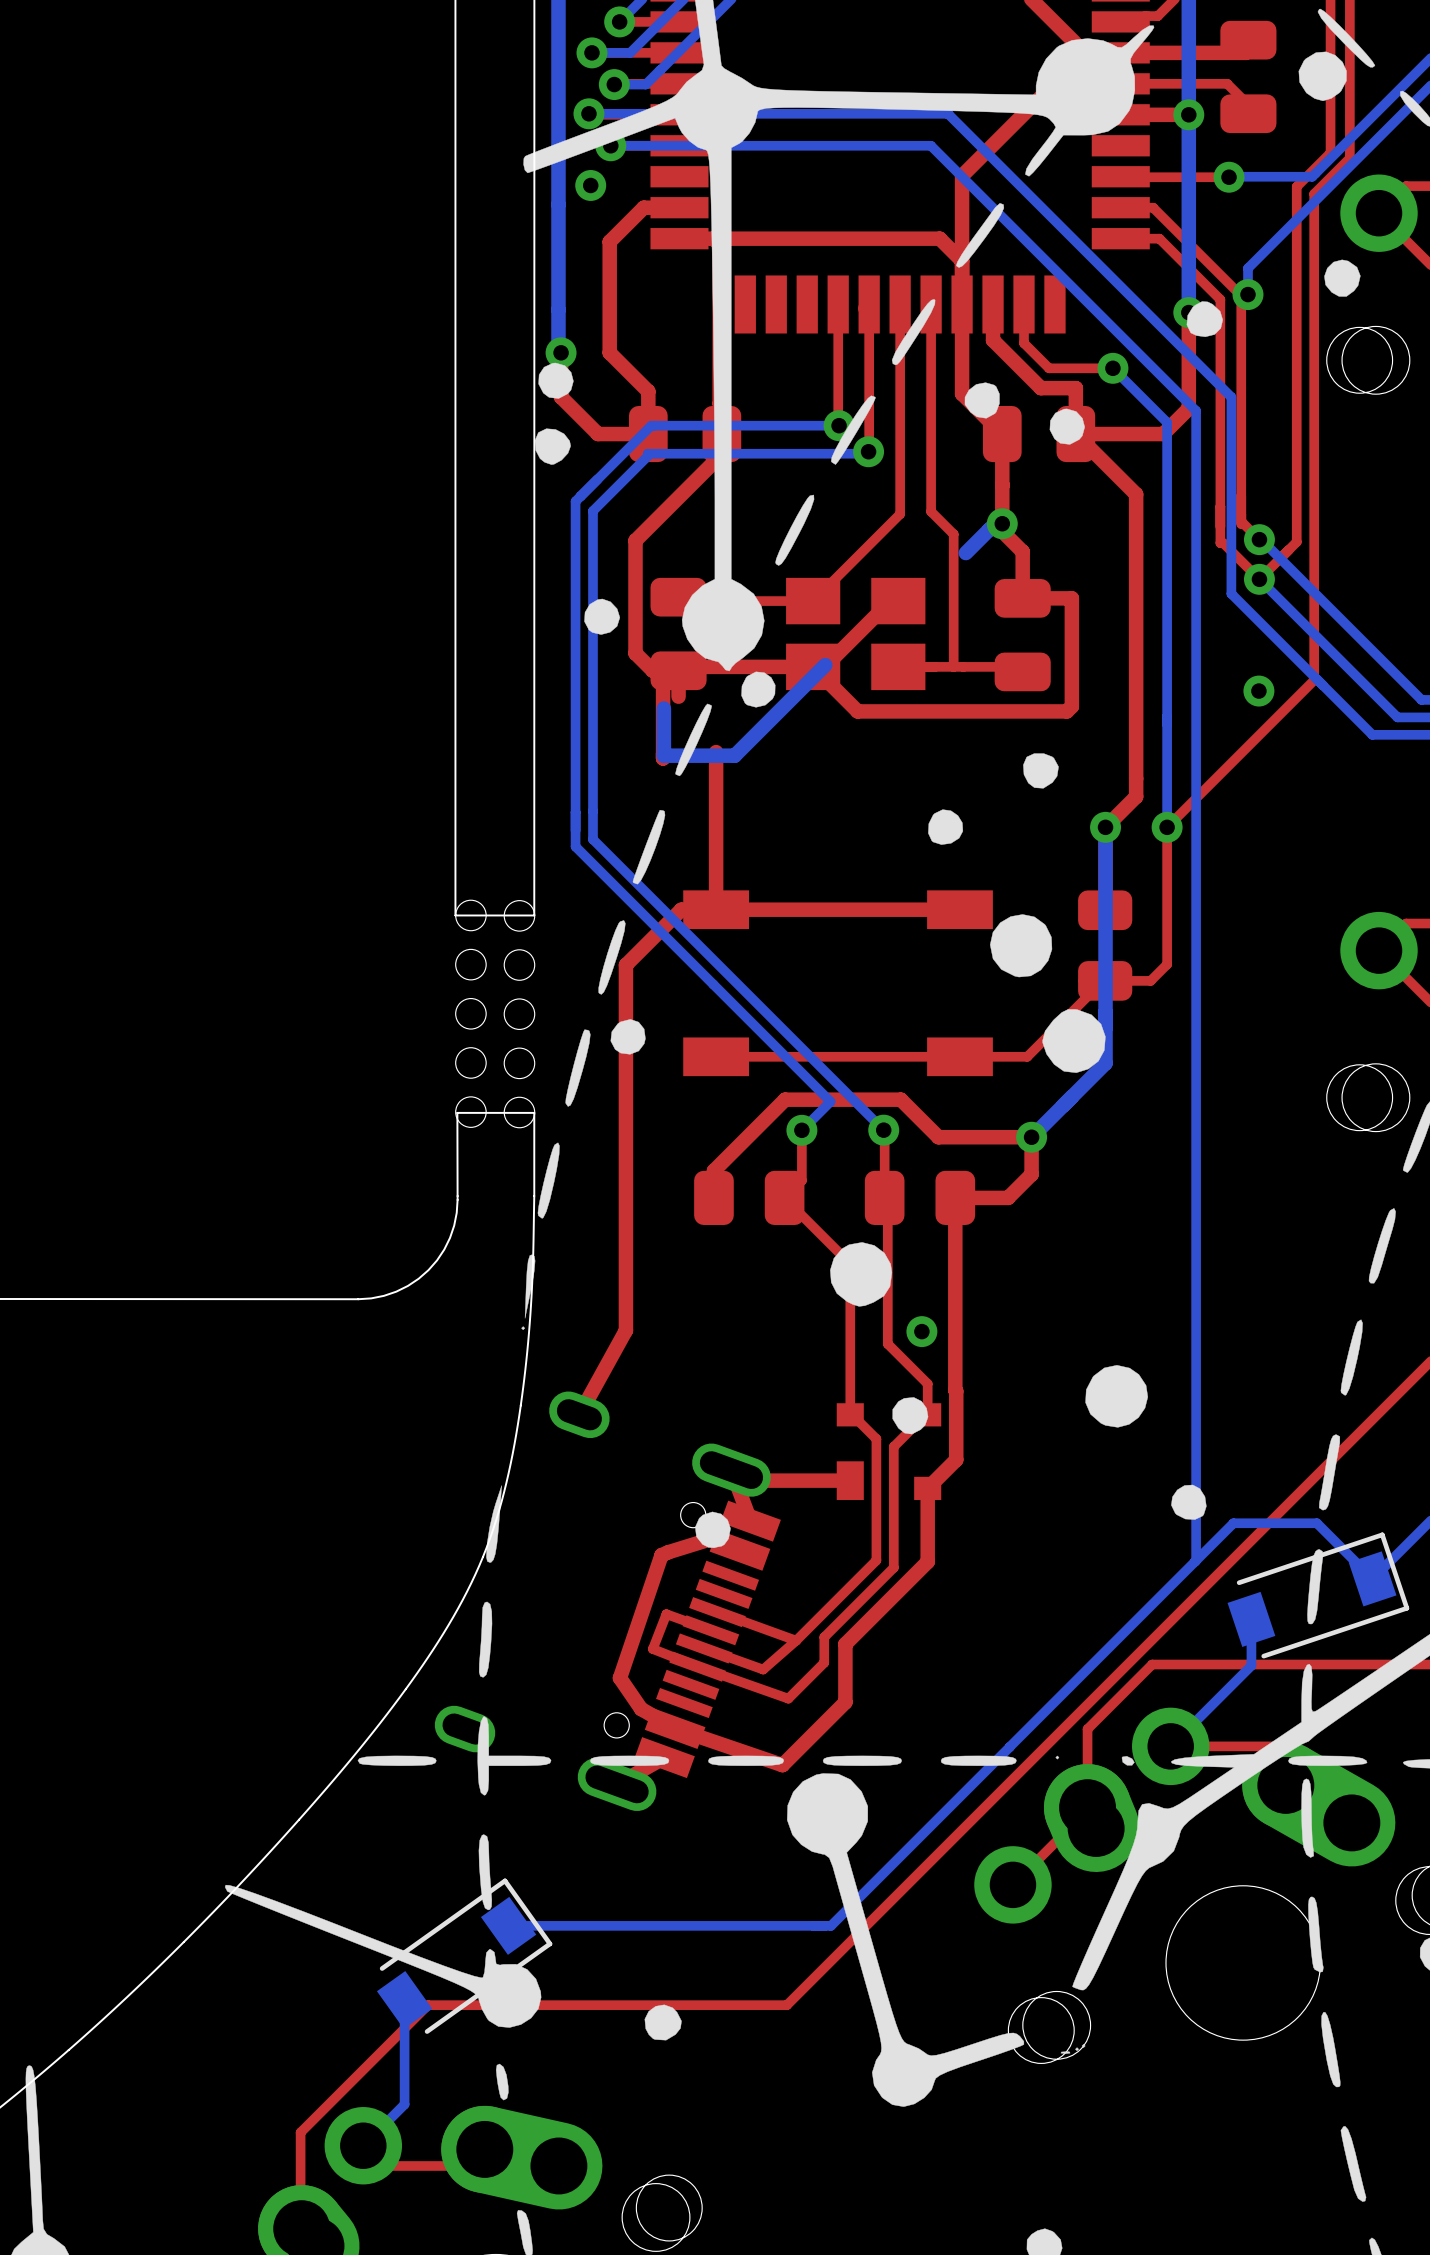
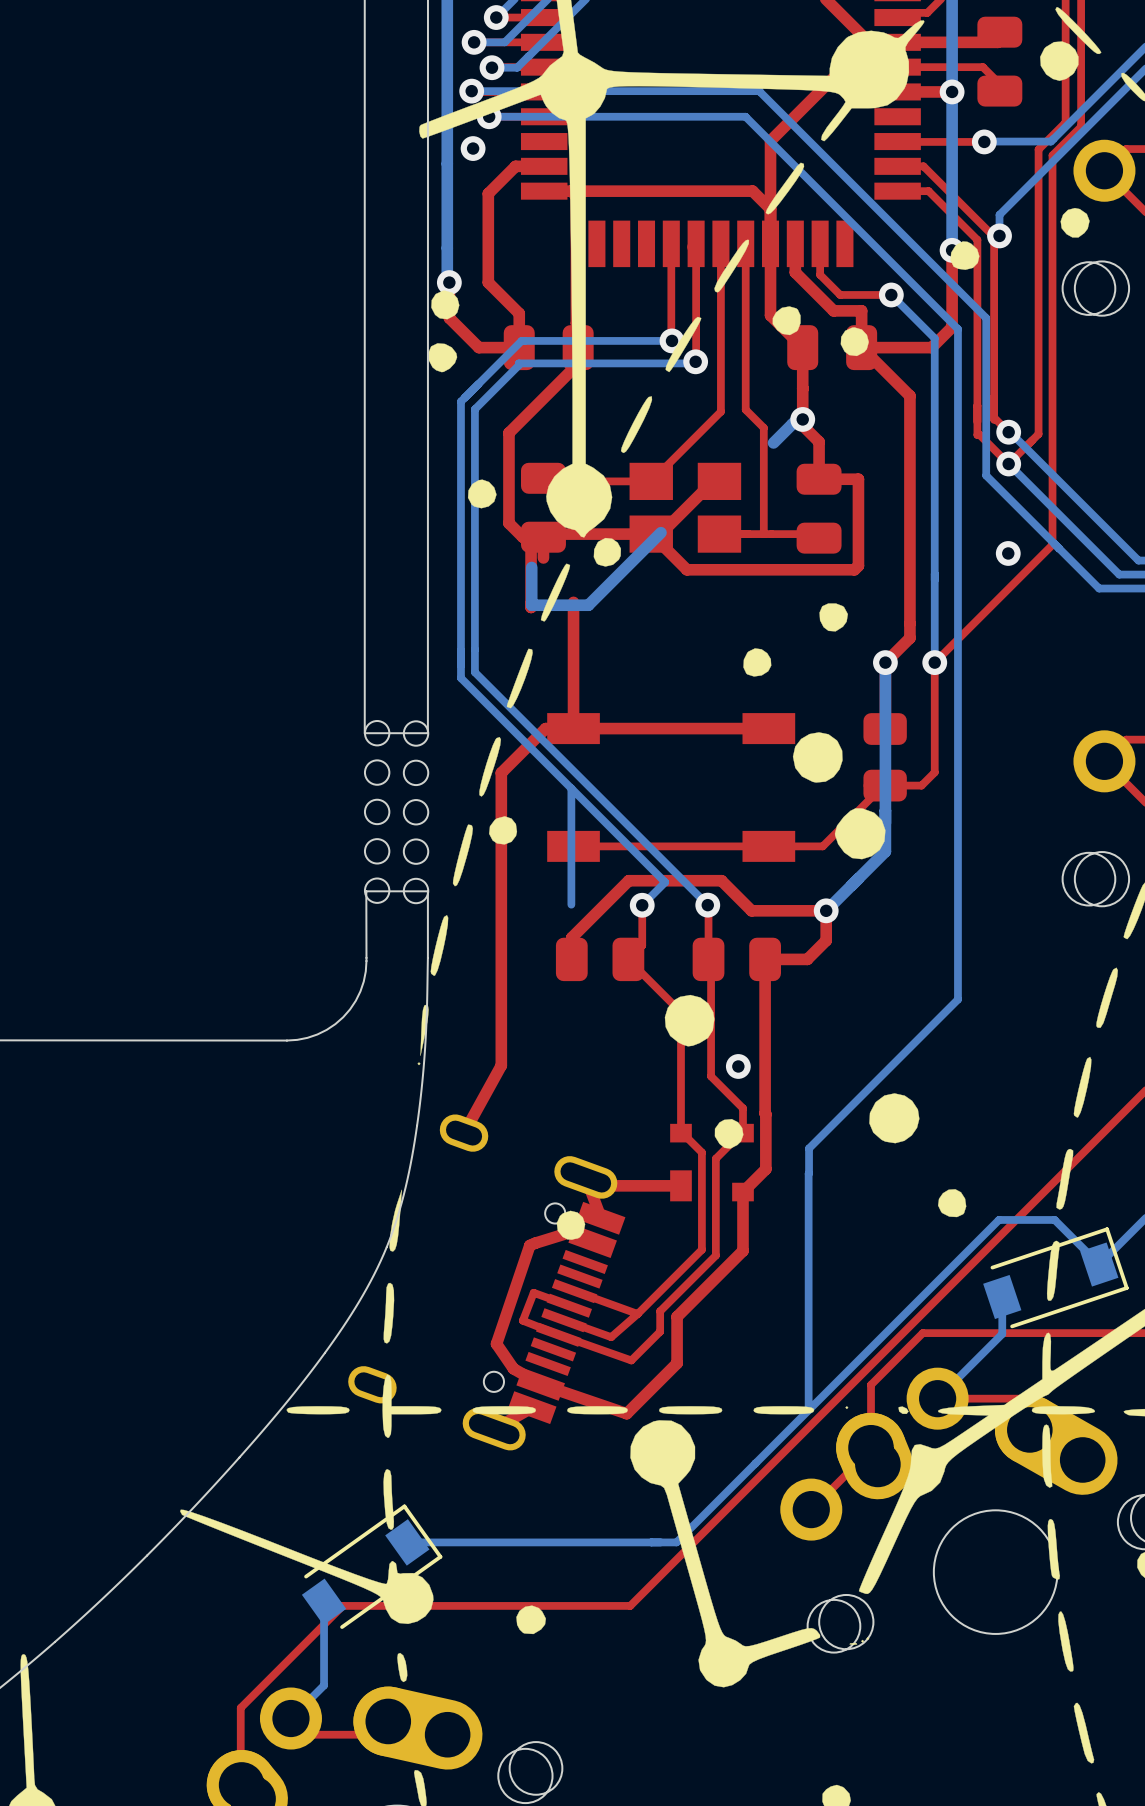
bottom track: none -> (571, 788) (571, 904)
bottom track: (1196, 1248) (1196, 1560) -> (957, 999) (809, 1148) (809, 1173)
bottom track: none -> (808, 1173) (808, 1410)
bottom track: (1247, 1523) (1233, 1523) (1009, 1747) -> (998, 1219) (676, 1542) (665, 1542)
bottom track: (1009, 1747) (831, 1925) -> none

